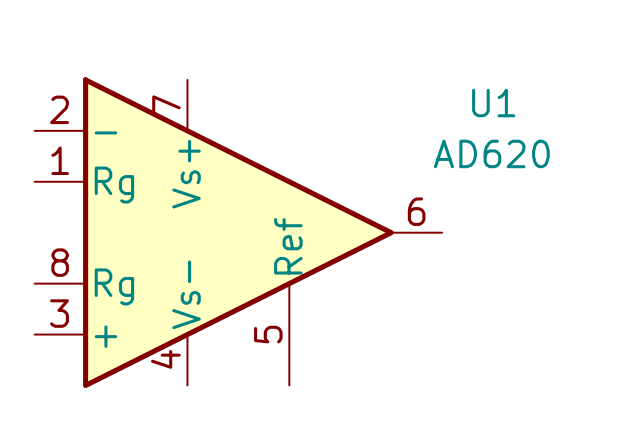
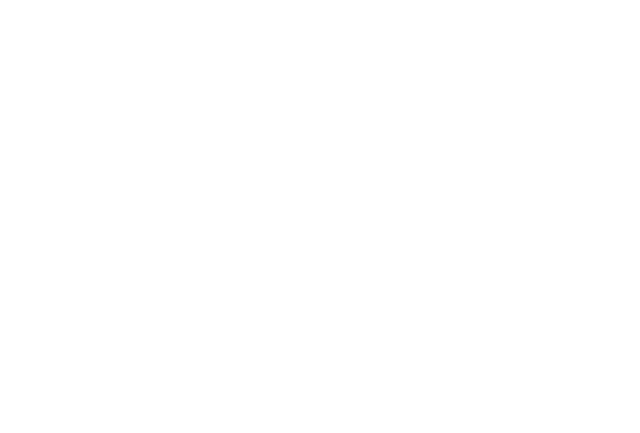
U1: AD620 (238, 232) -> none

